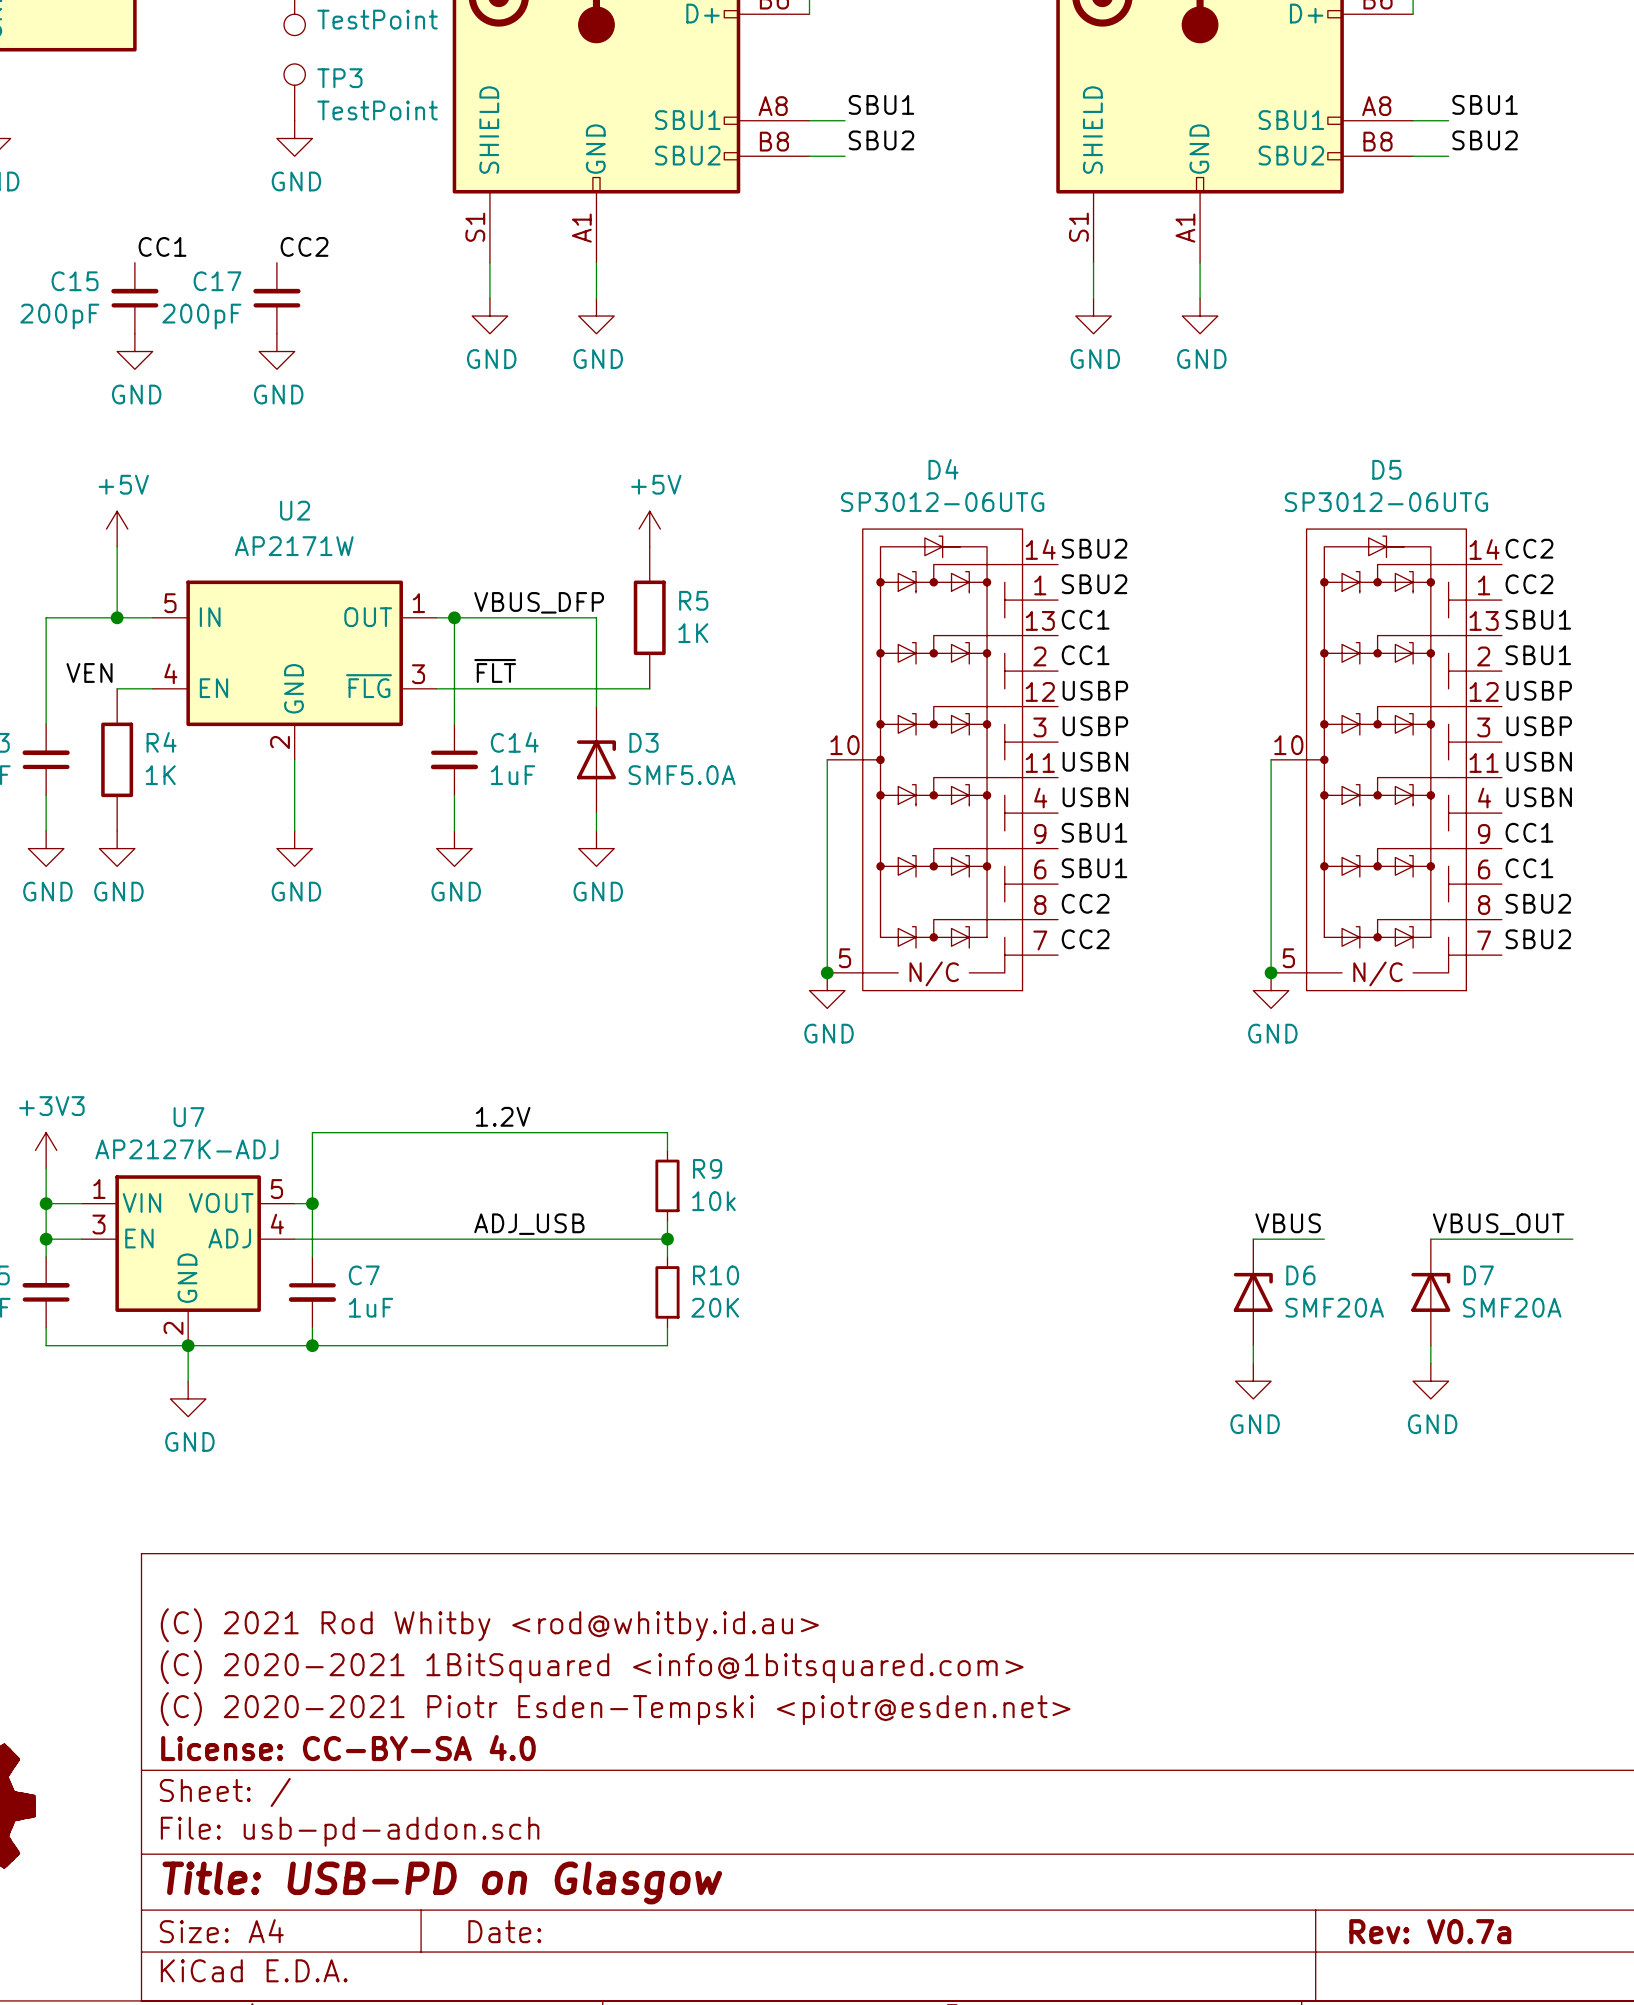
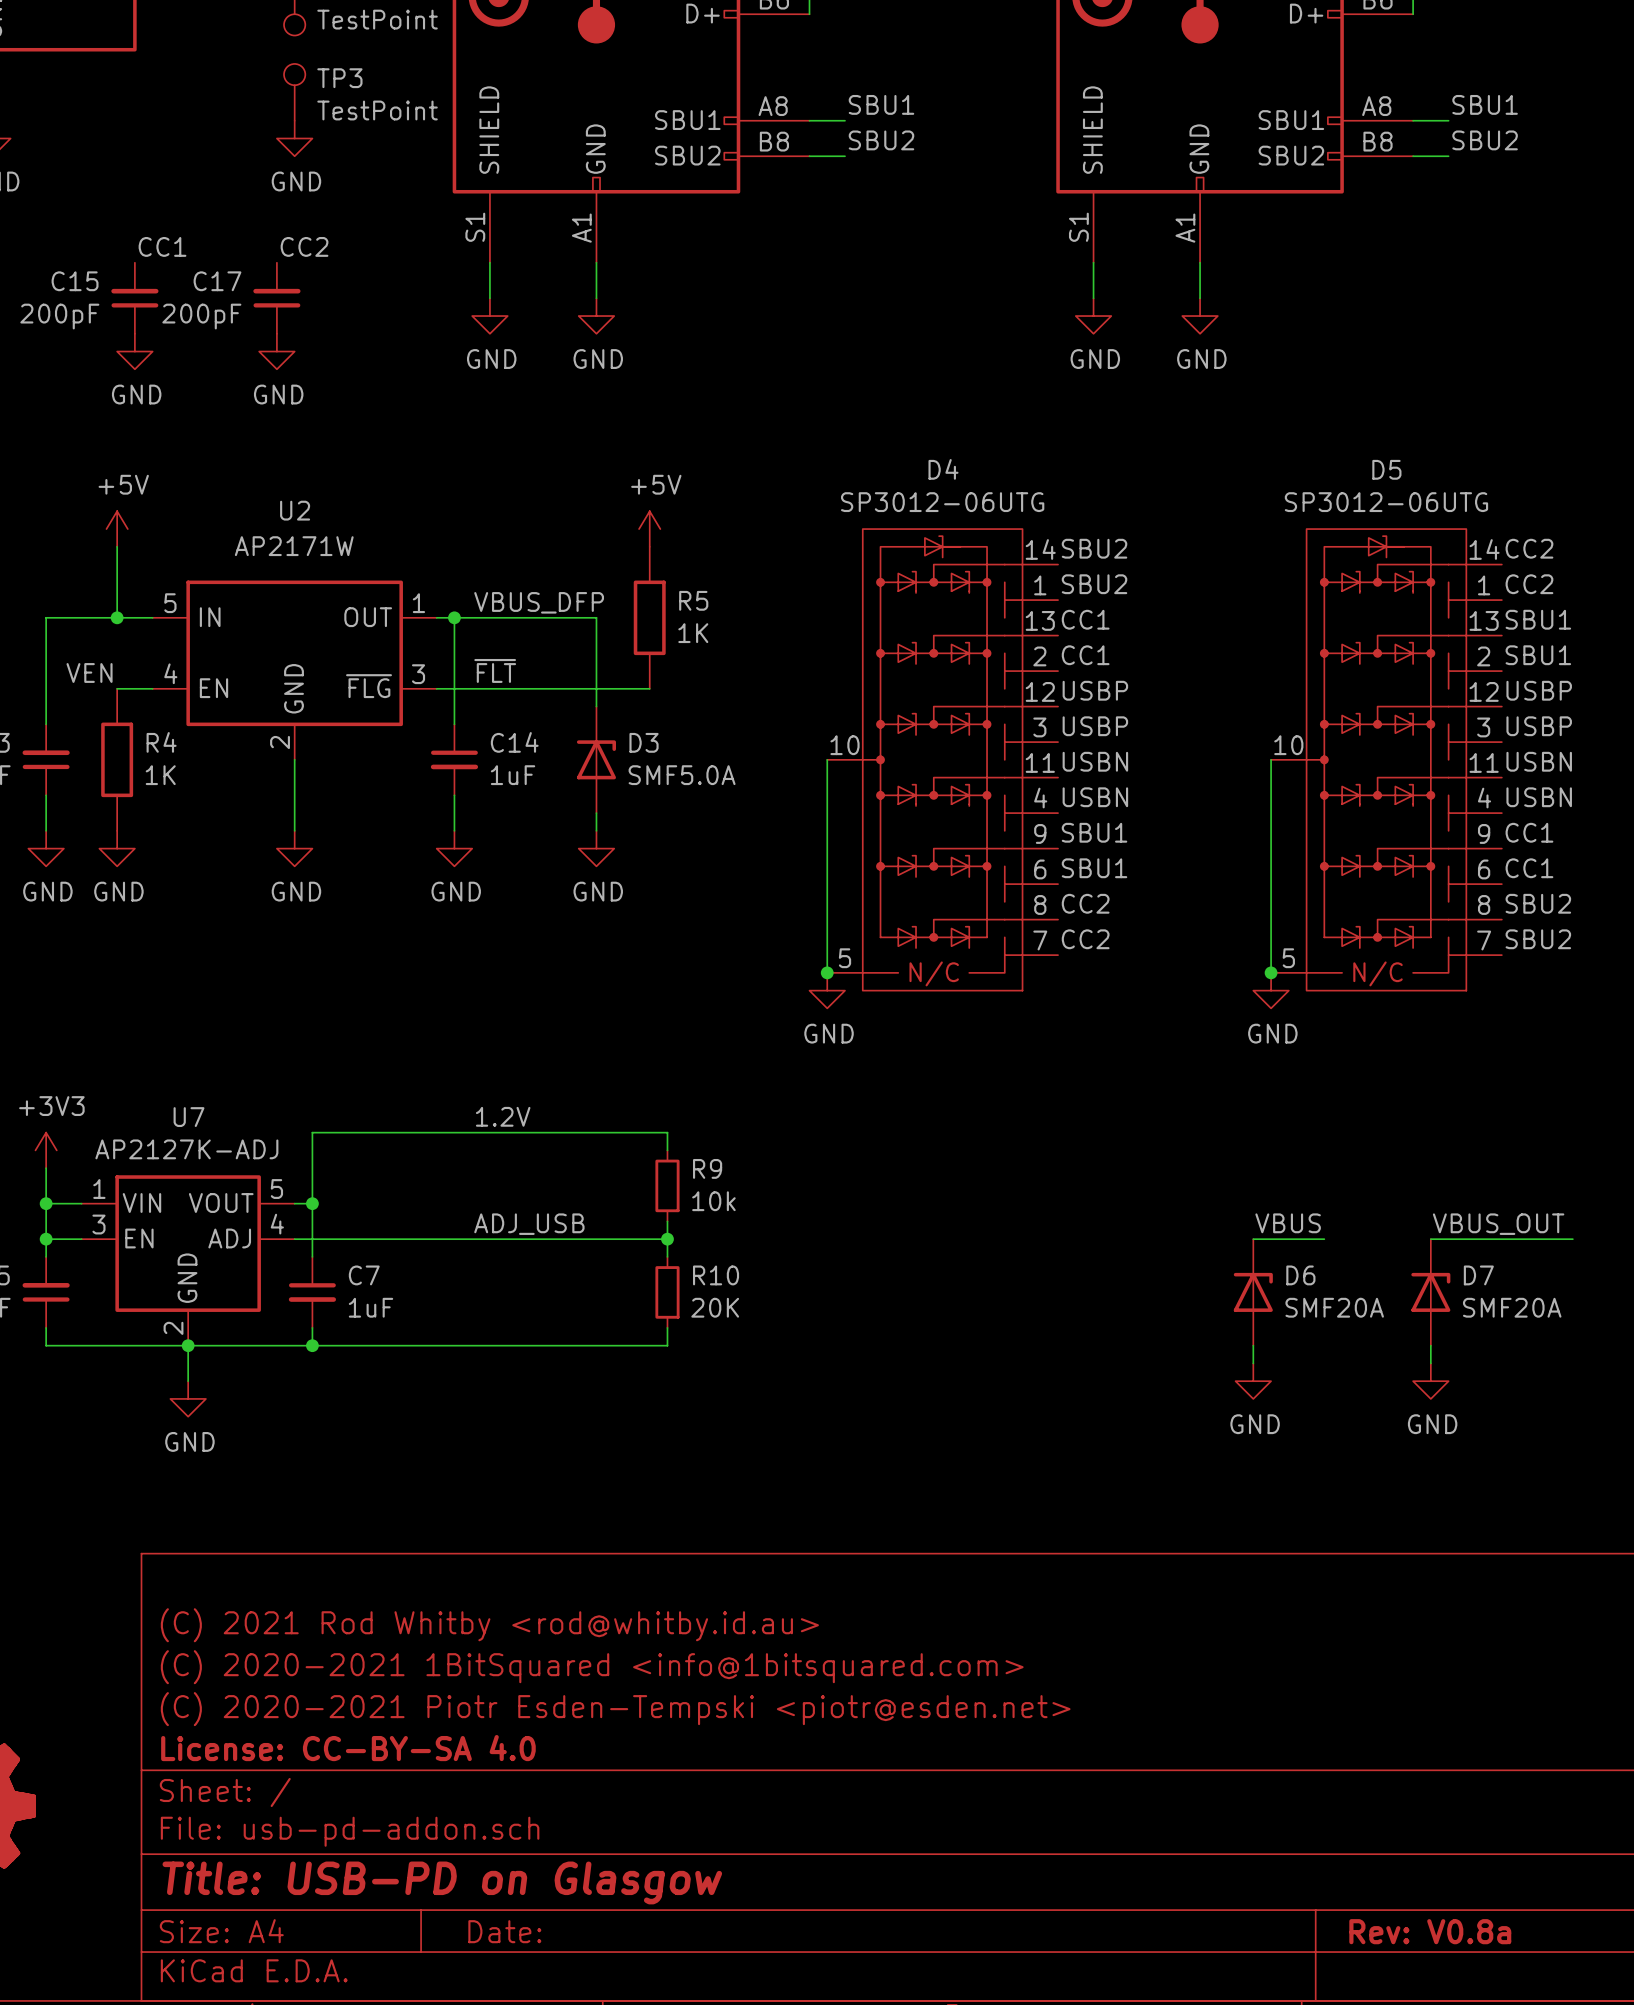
title block: Rev: V0.7a (1430, 1931) -> Rev: V0.8a (1430, 1931)

